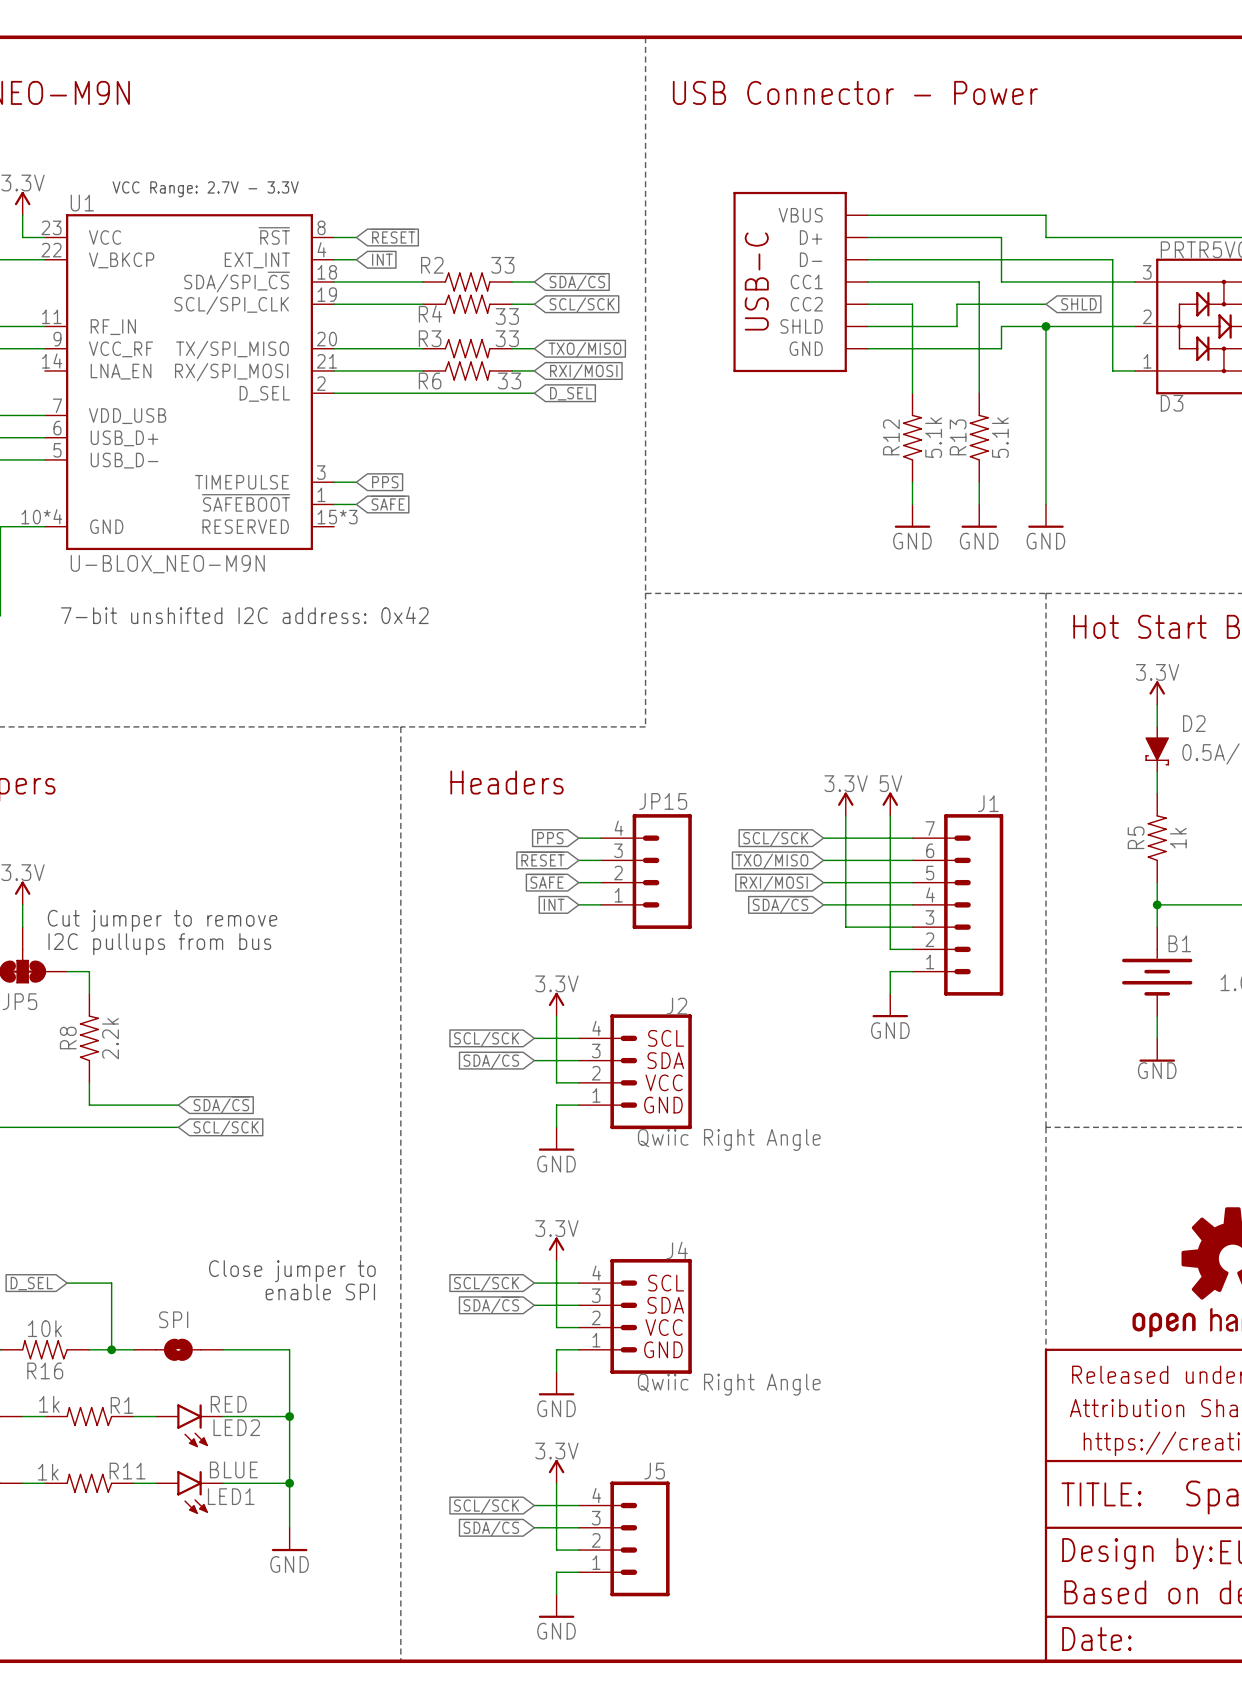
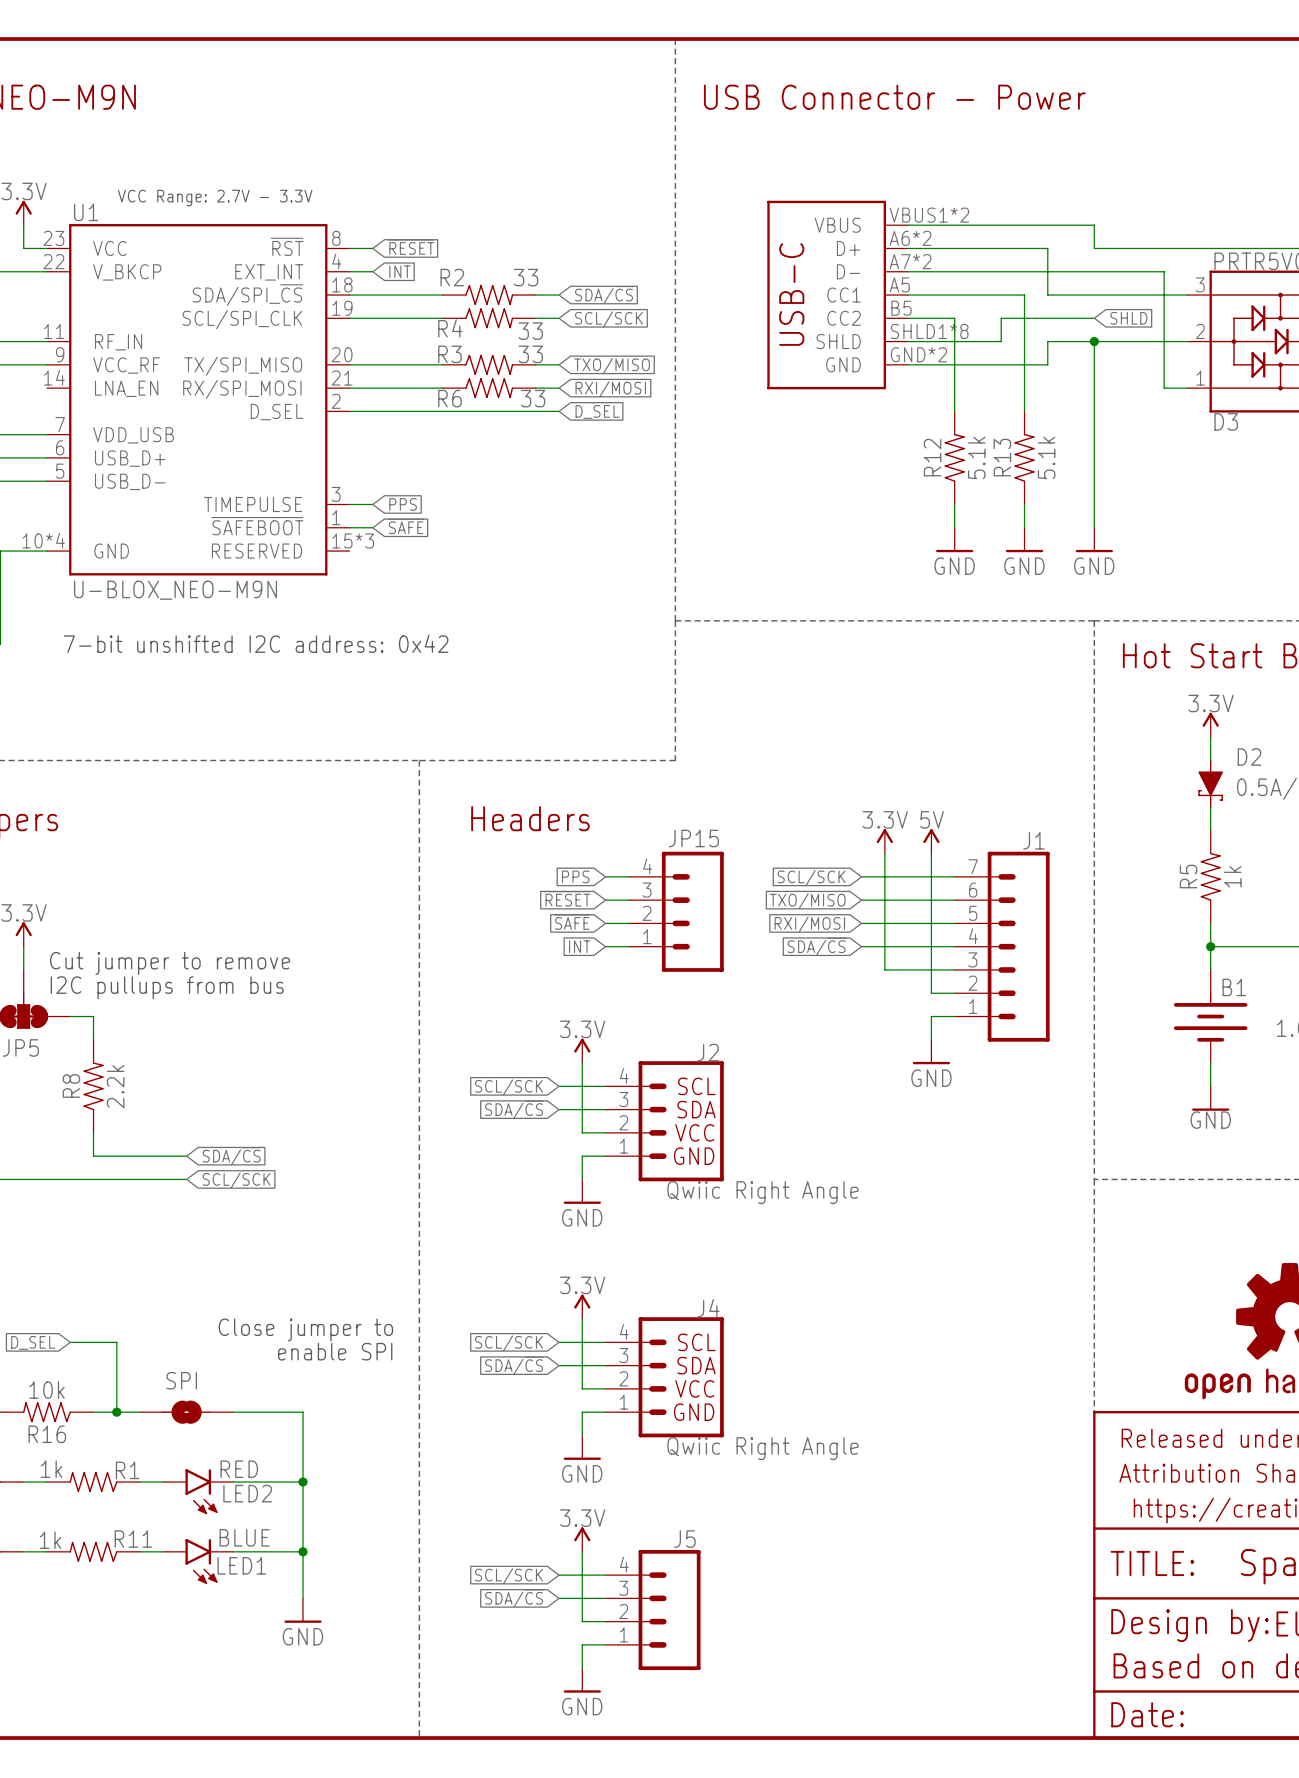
part pin number: none -> VBUS1*2 (929, 215)
part pin number: none -> A6*2 (910, 238)
part pin number: none -> A7*2 (910, 261)
part pin number: none -> A5 (899, 284)
part pin number: none -> B5 (901, 308)
part pin number: none -> SHLD1*8 (929, 331)
part pin number: none -> GND*2 (918, 354)

